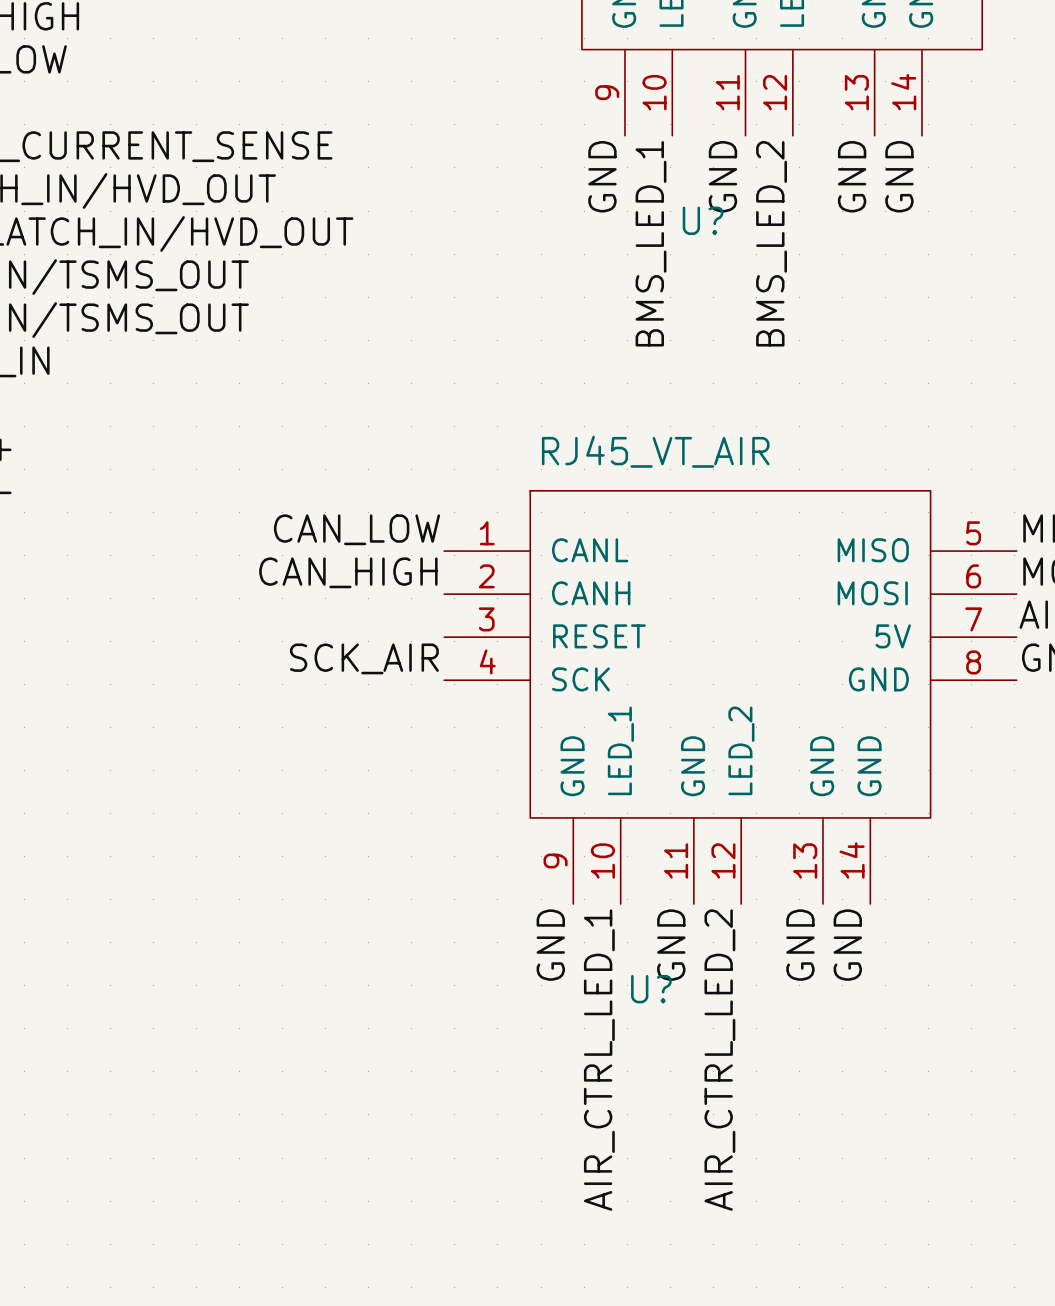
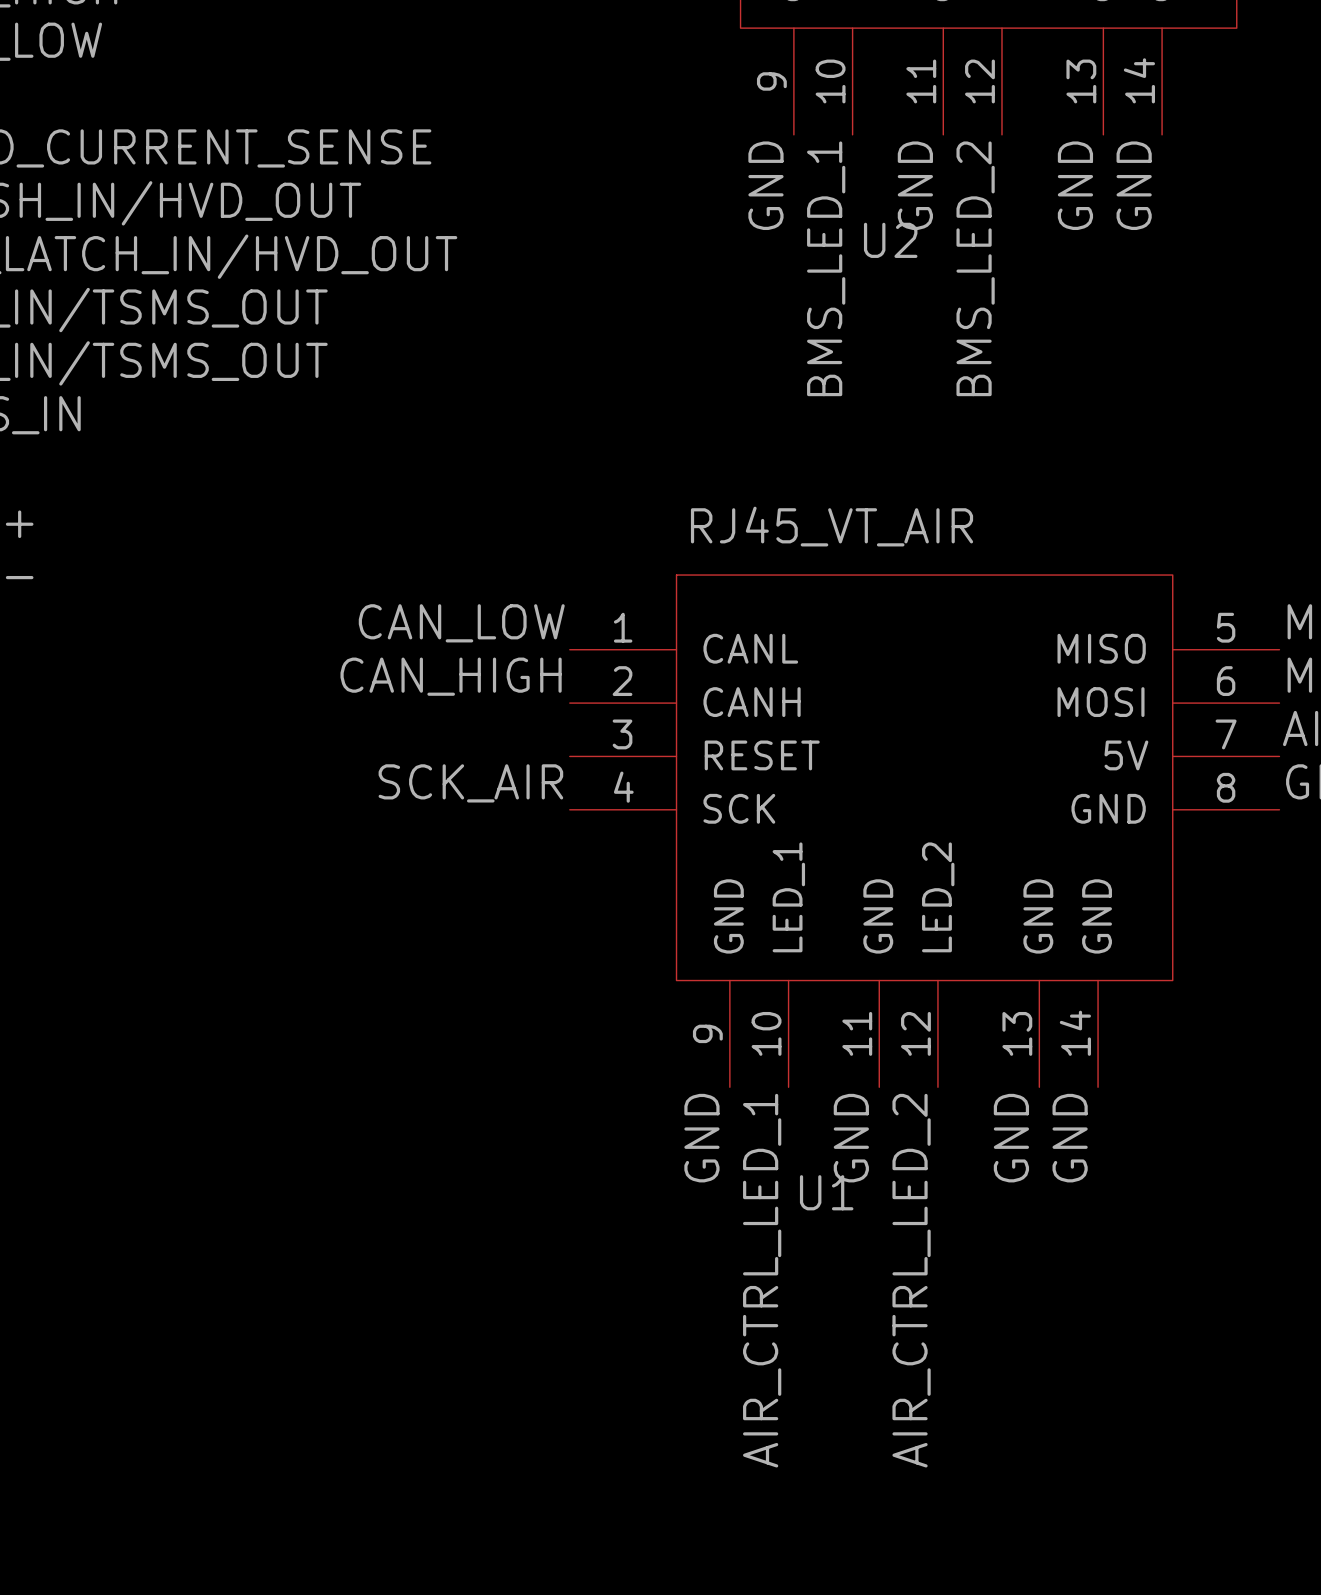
U? name: U? (703, 220) -> U2 (890, 240)
U? name: U? (651, 989) -> U1 (826, 1192)

